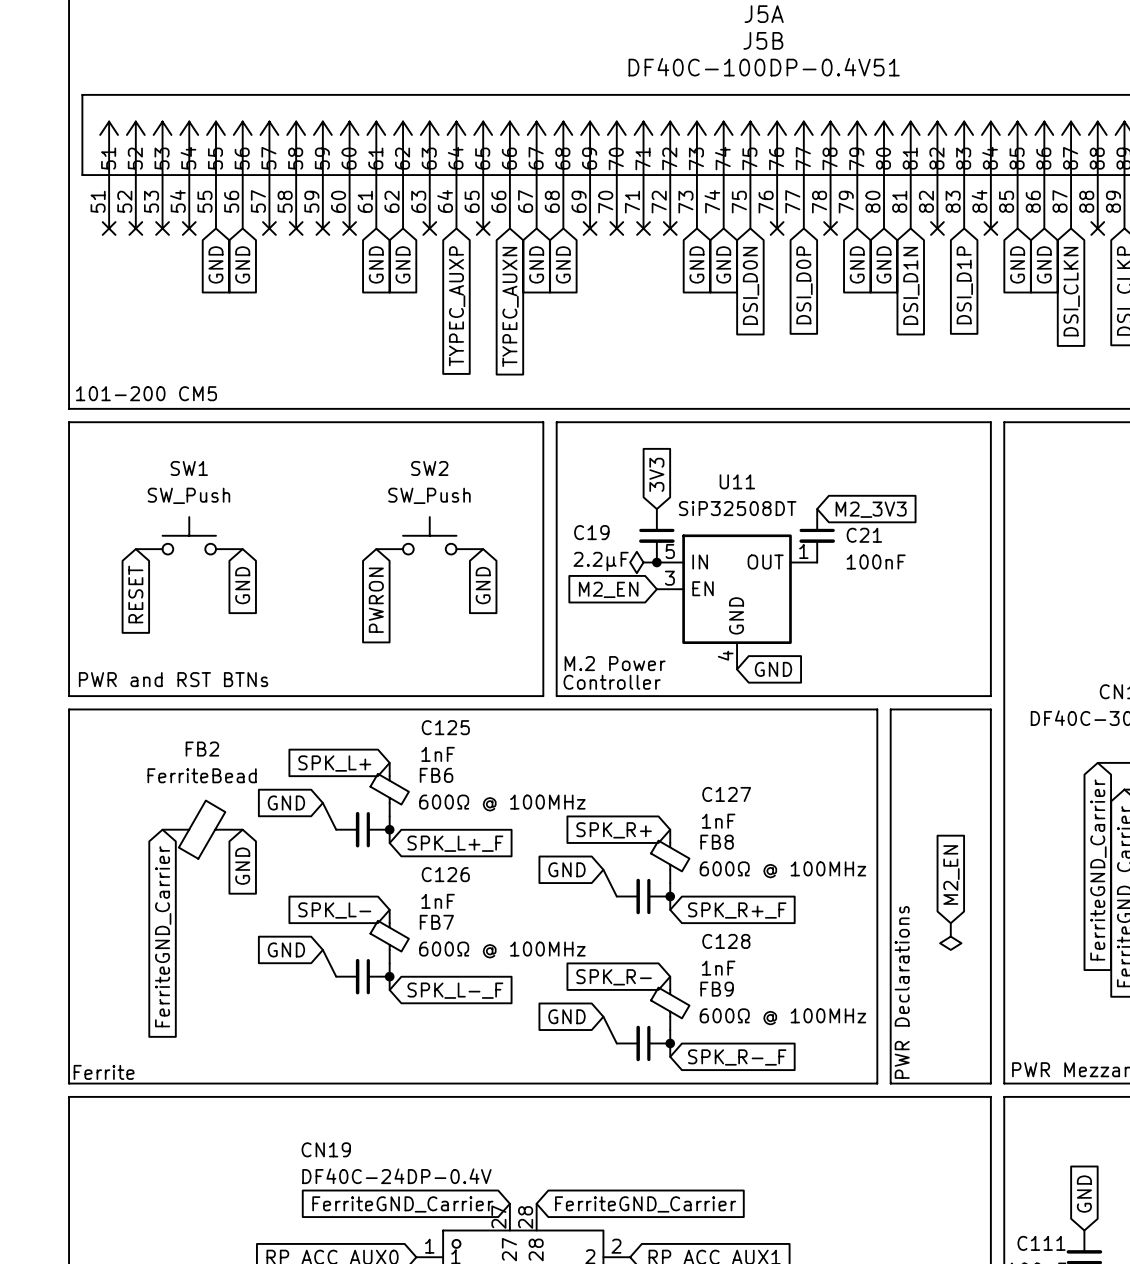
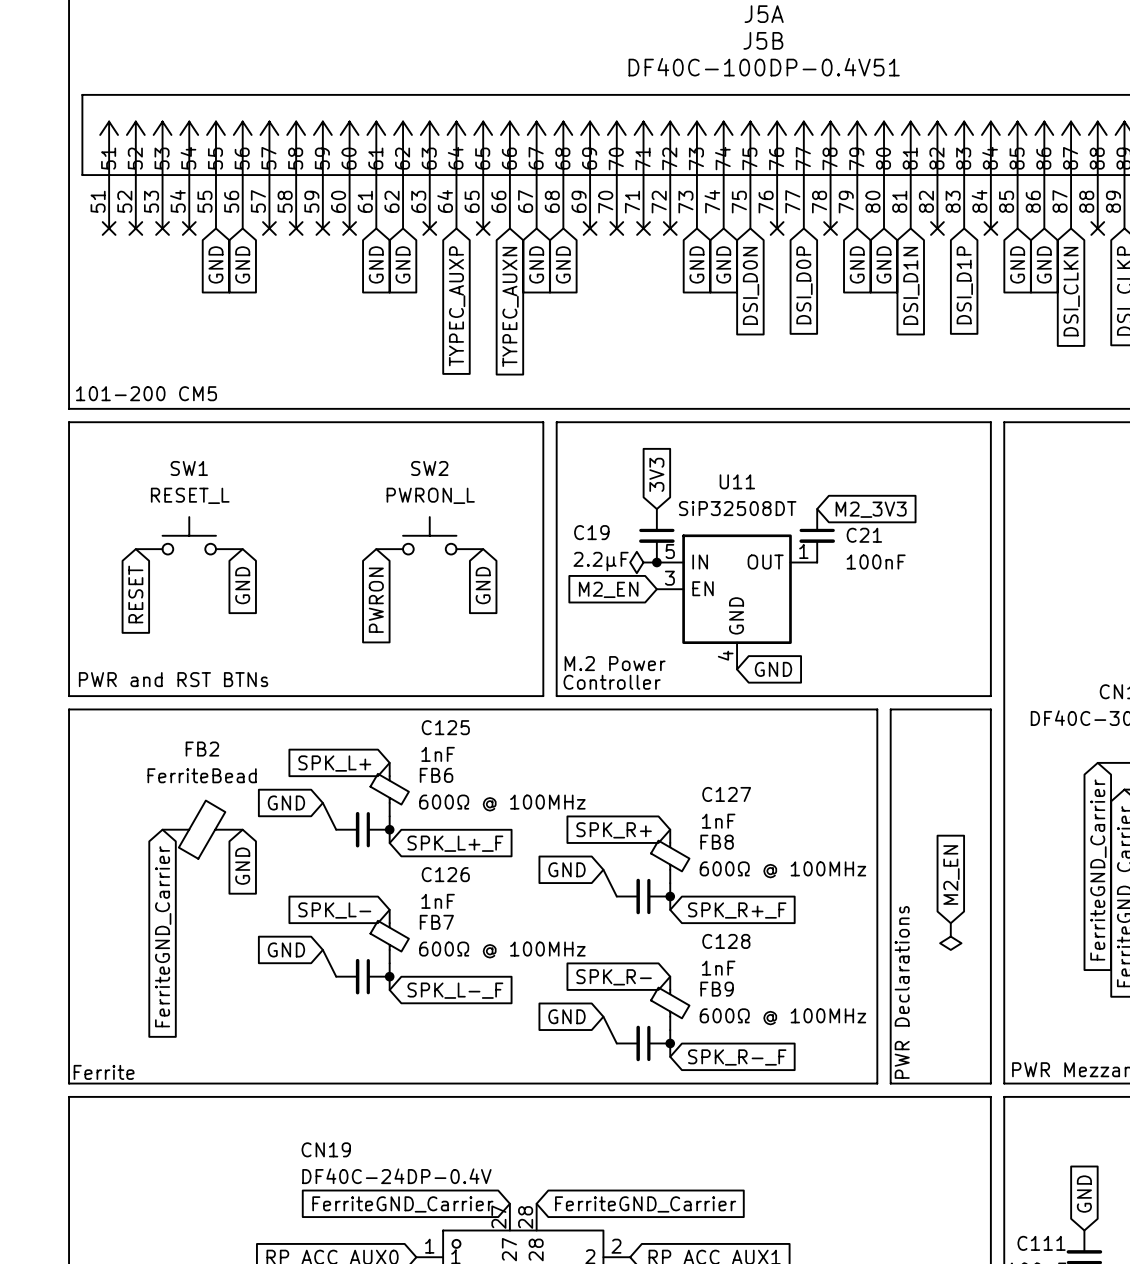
SW1 value: SW_Push (188, 495) -> RESET_L (190, 495)
SW2 value: SW_Push (429, 495) -> PWRON_L (430, 495)

